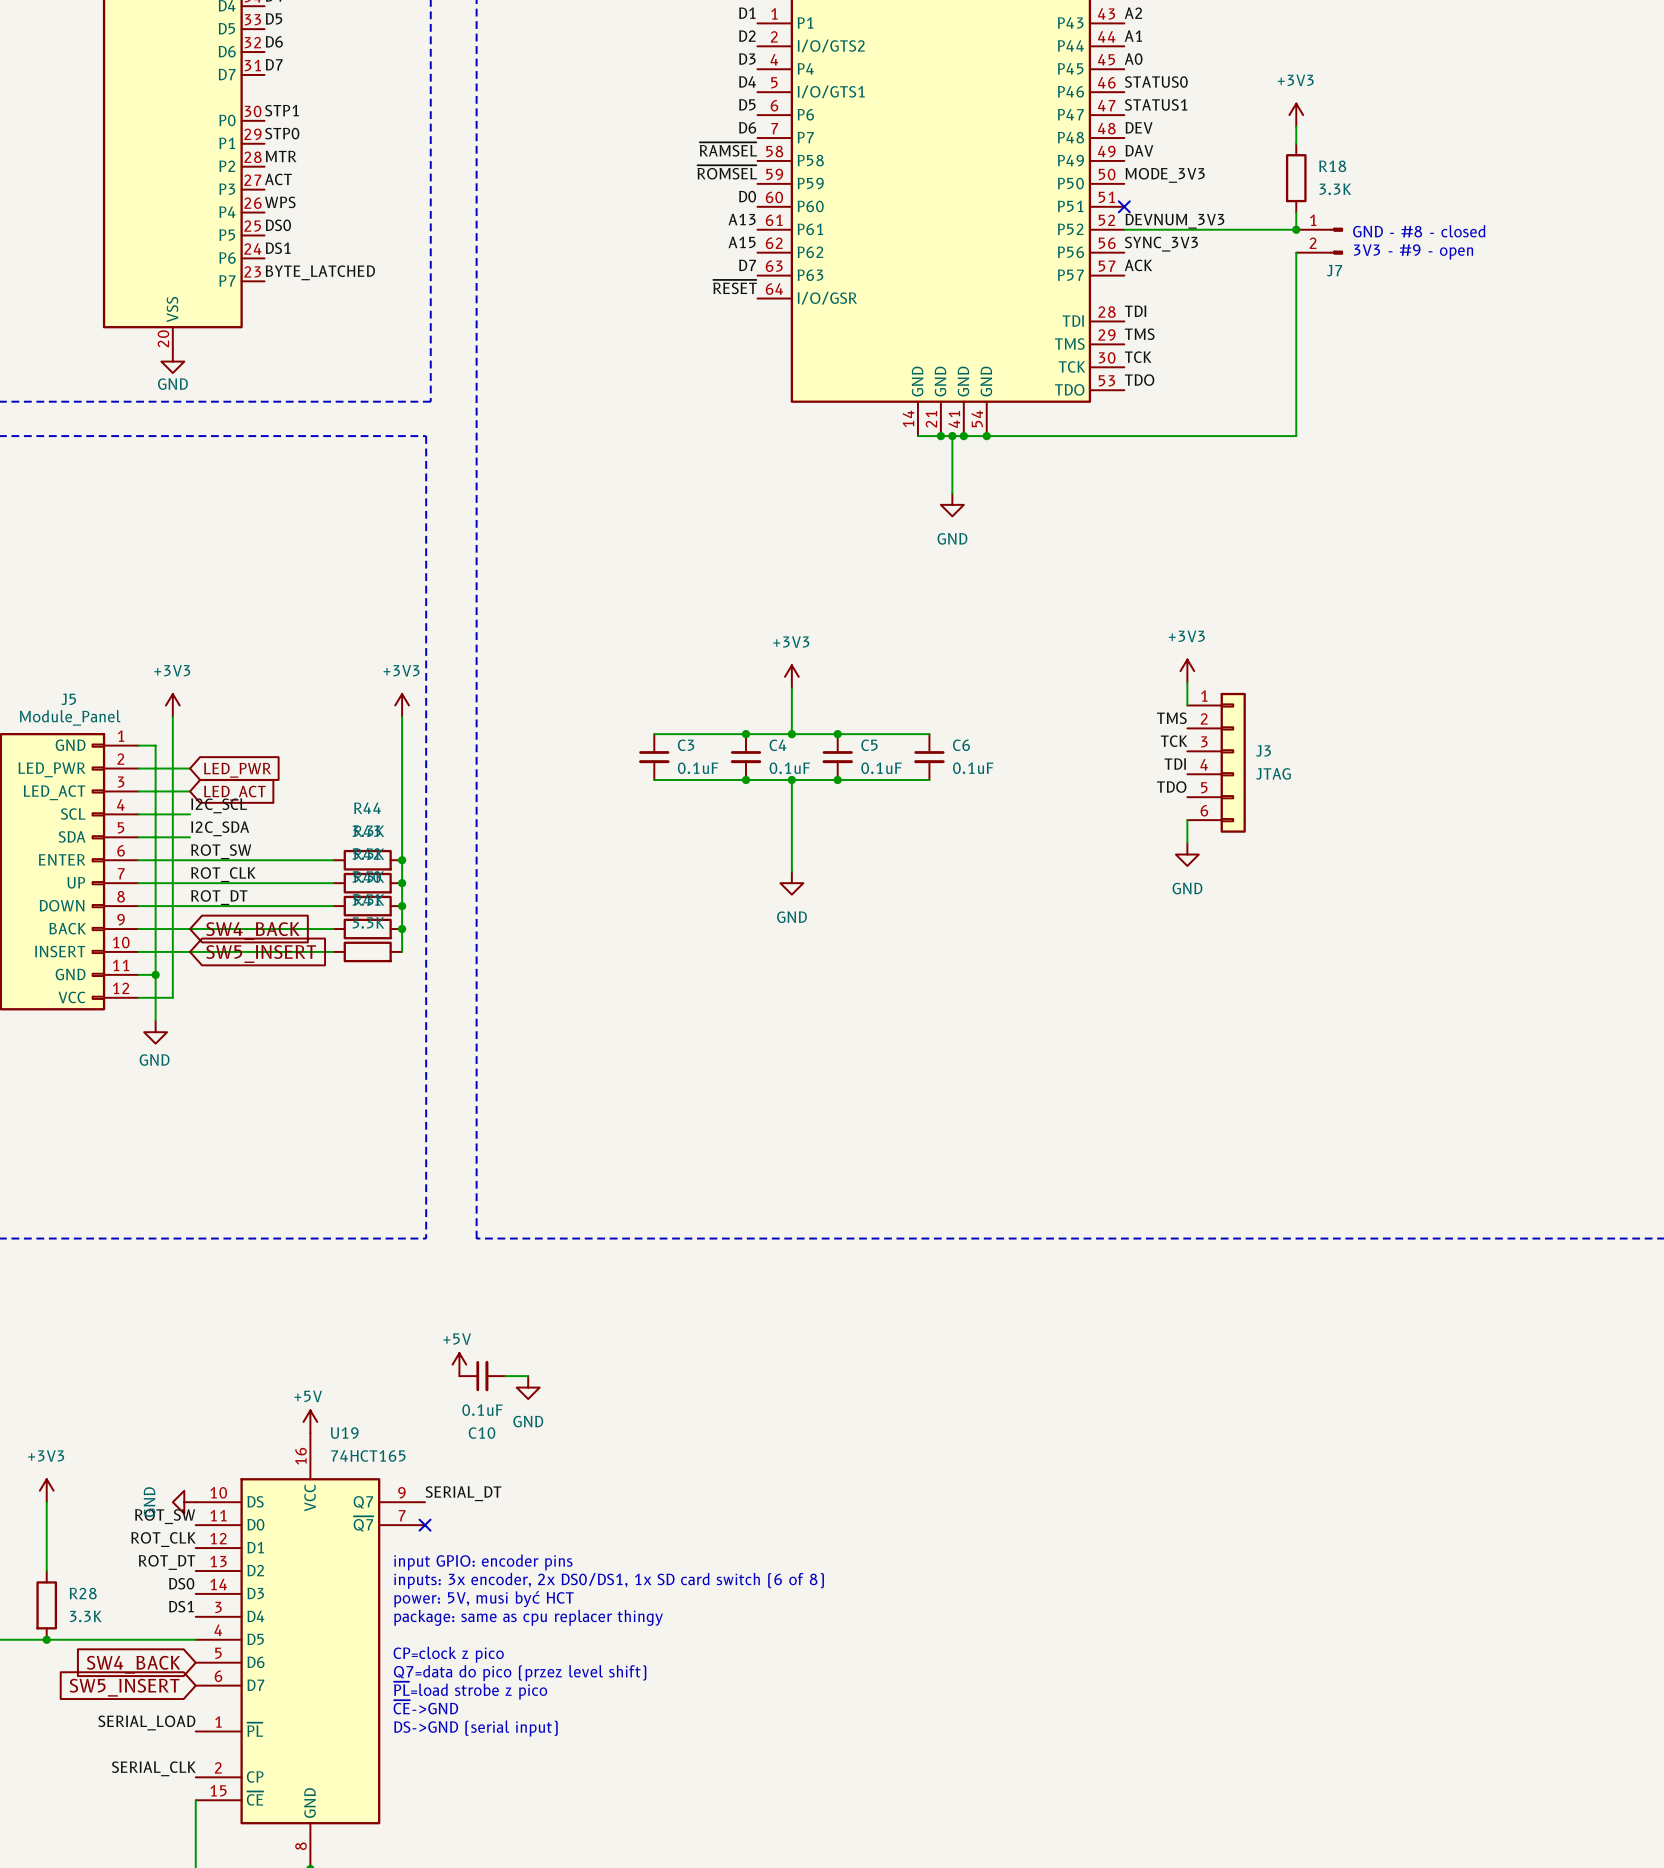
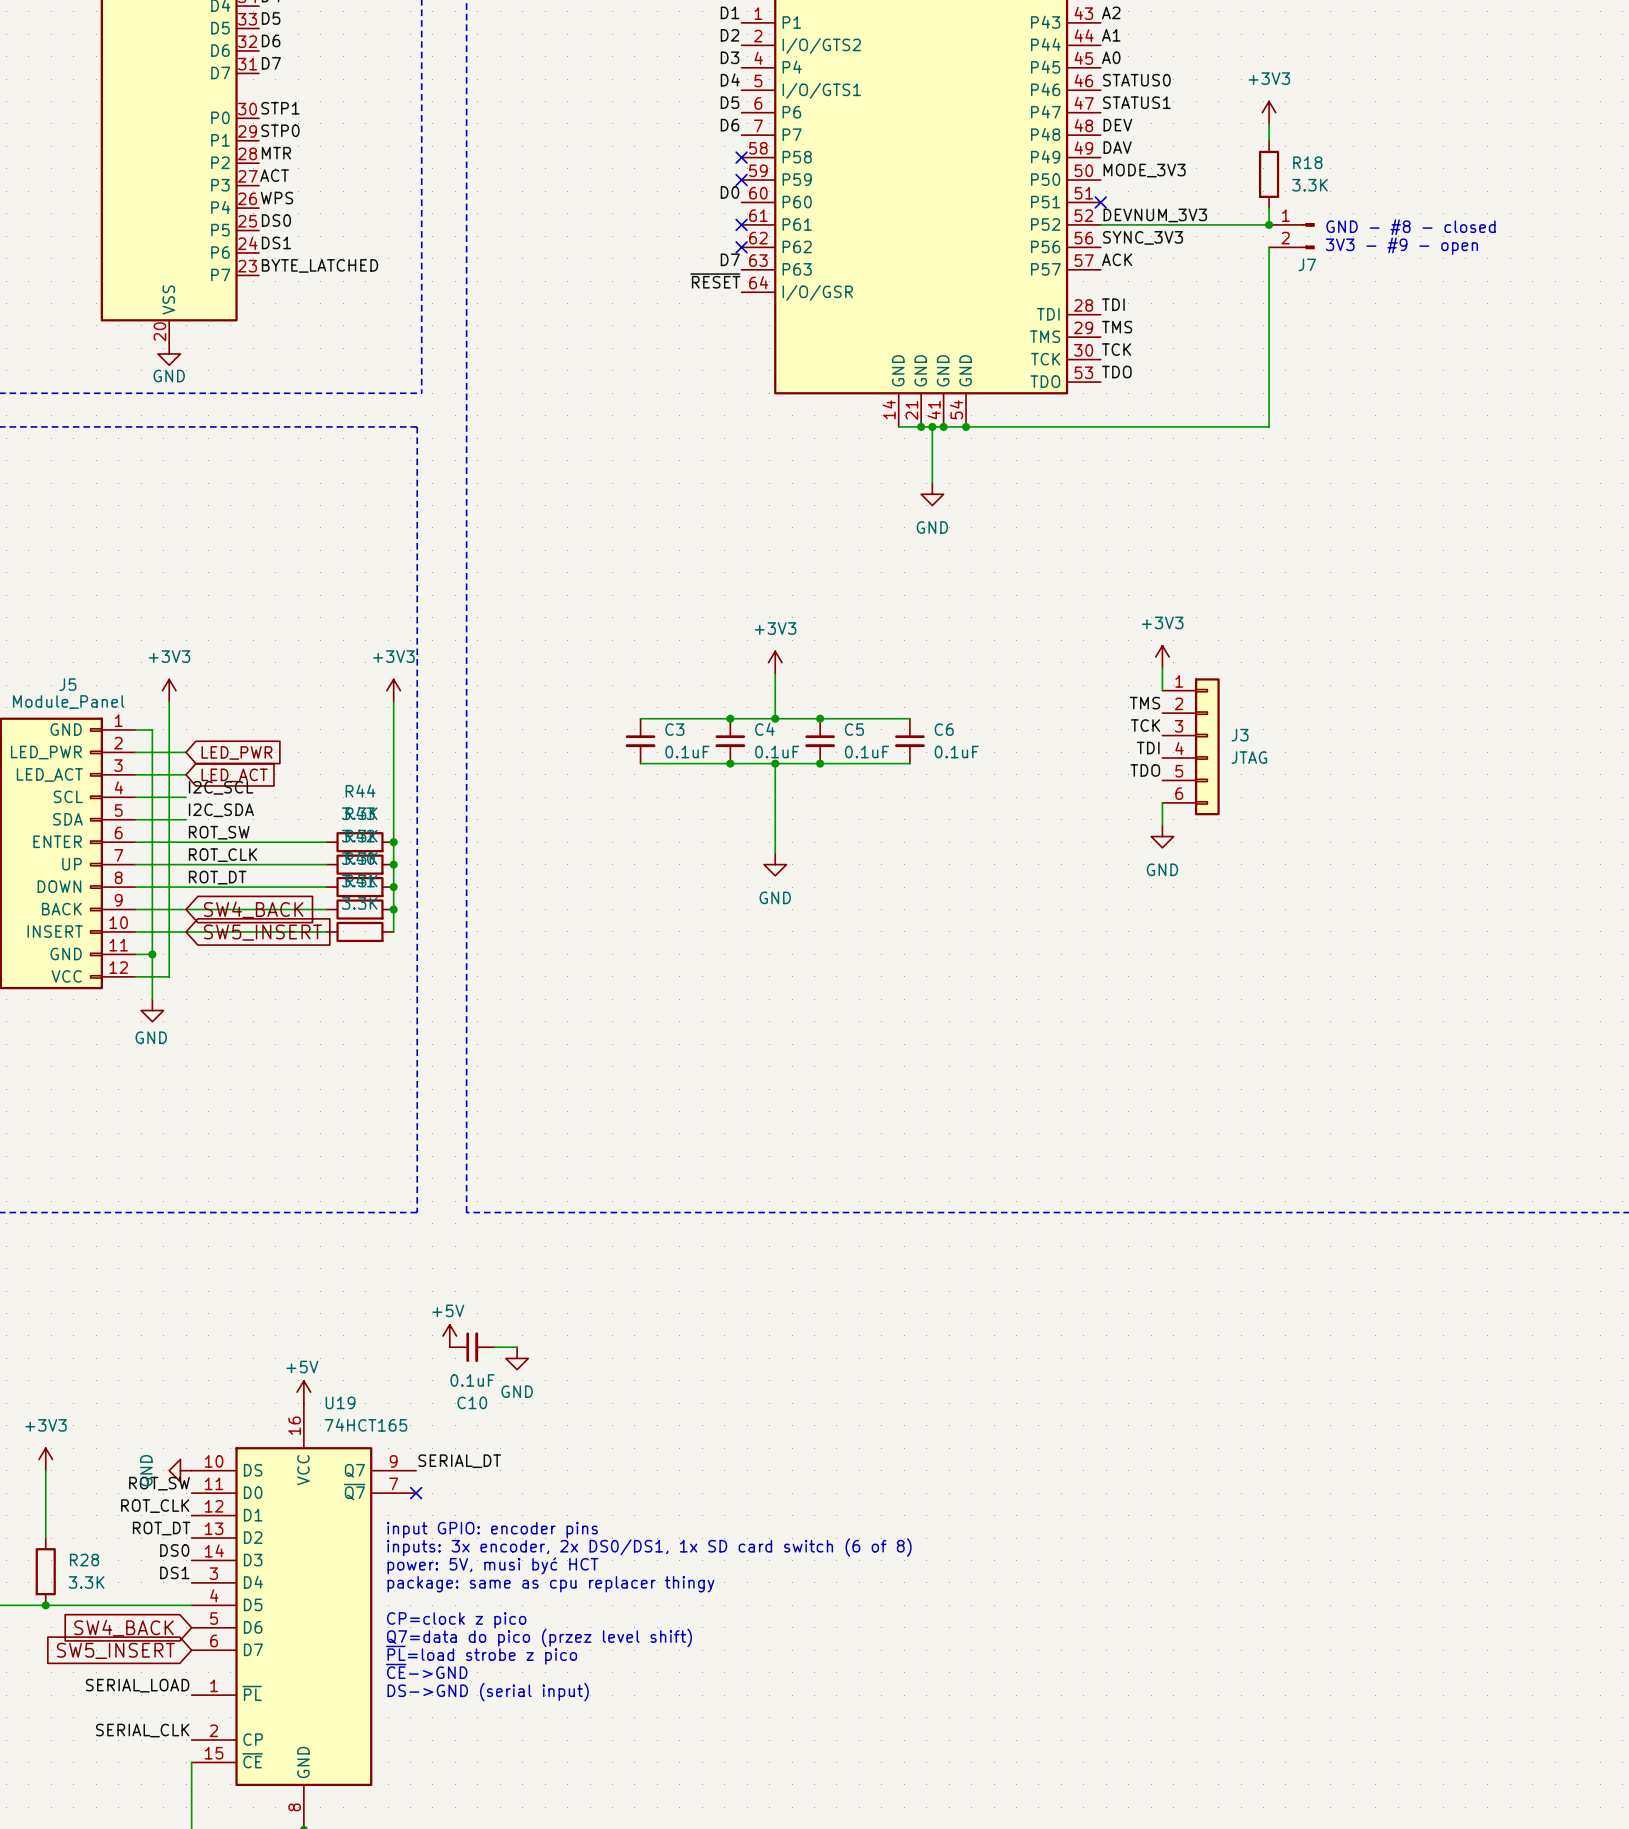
label: ~{RAMSEL} (728, 149) -> none
no-connect mark: none -> (741, 157)
label: ~{ROMSEL} (727, 172) -> none
no-connect mark: none -> (741, 180)
label: A13 (742, 219) -> none
no-connect mark: none -> (741, 224)
label: A15 (742, 242) -> none
no-connect mark: none -> (741, 247)

